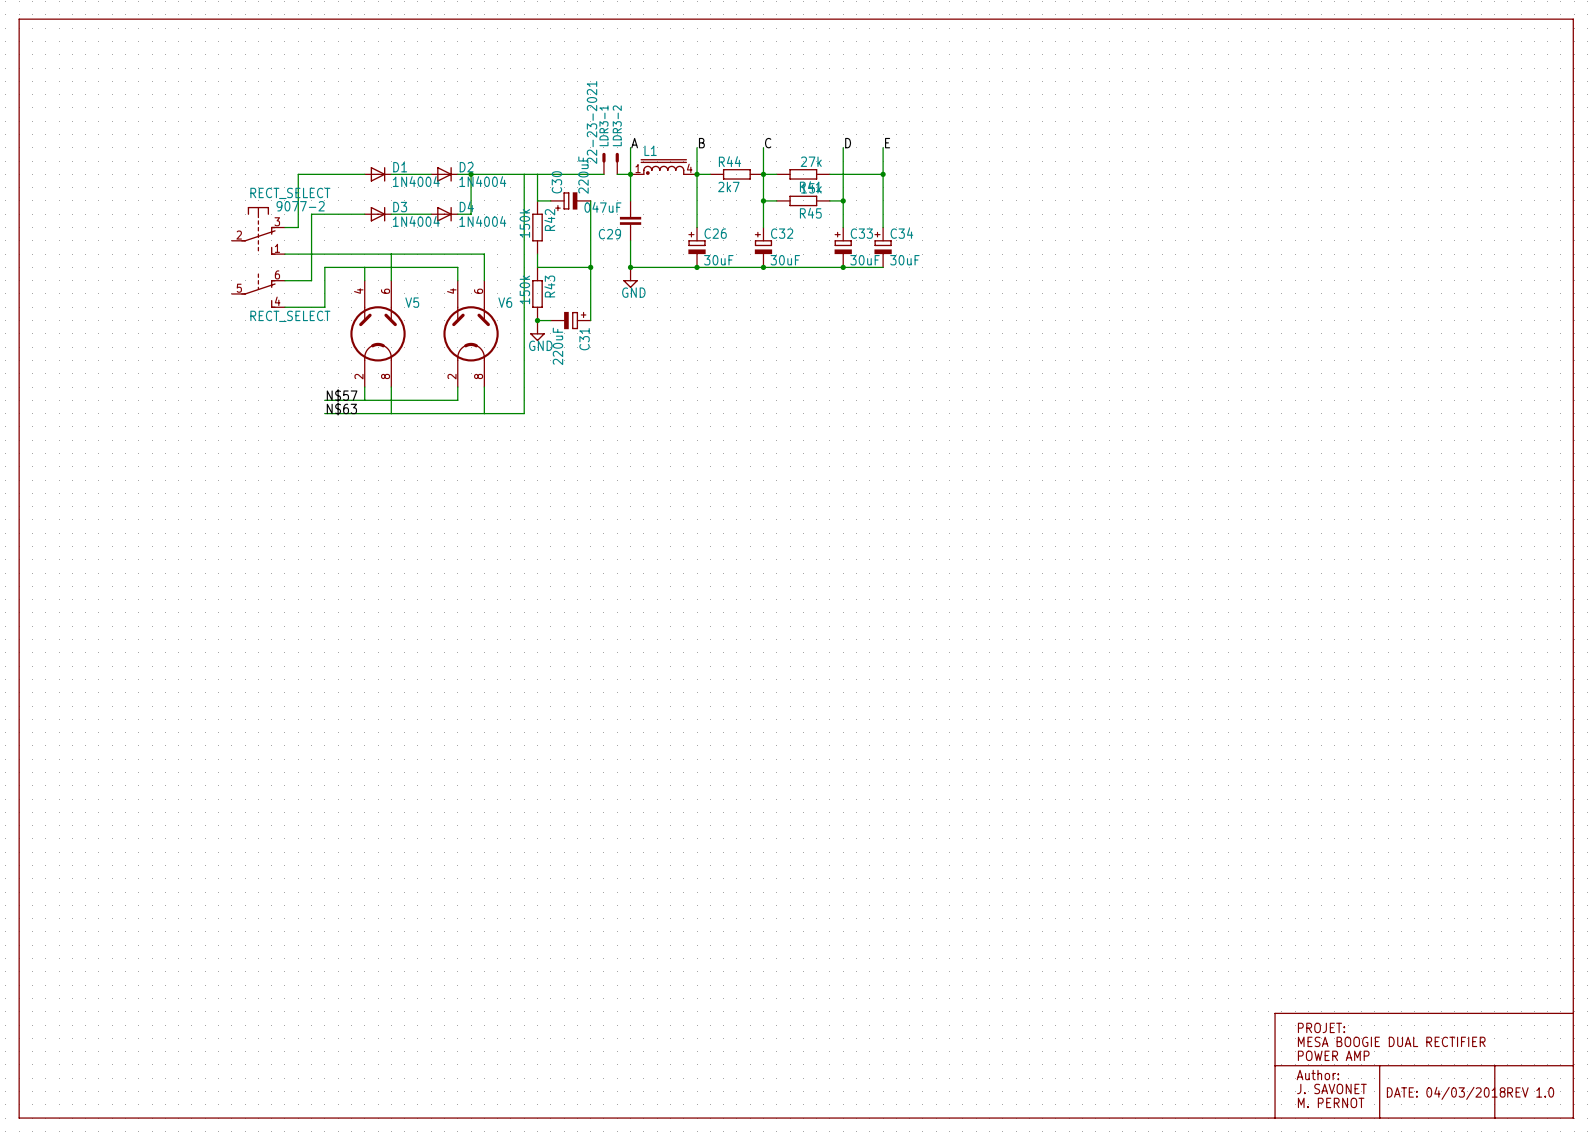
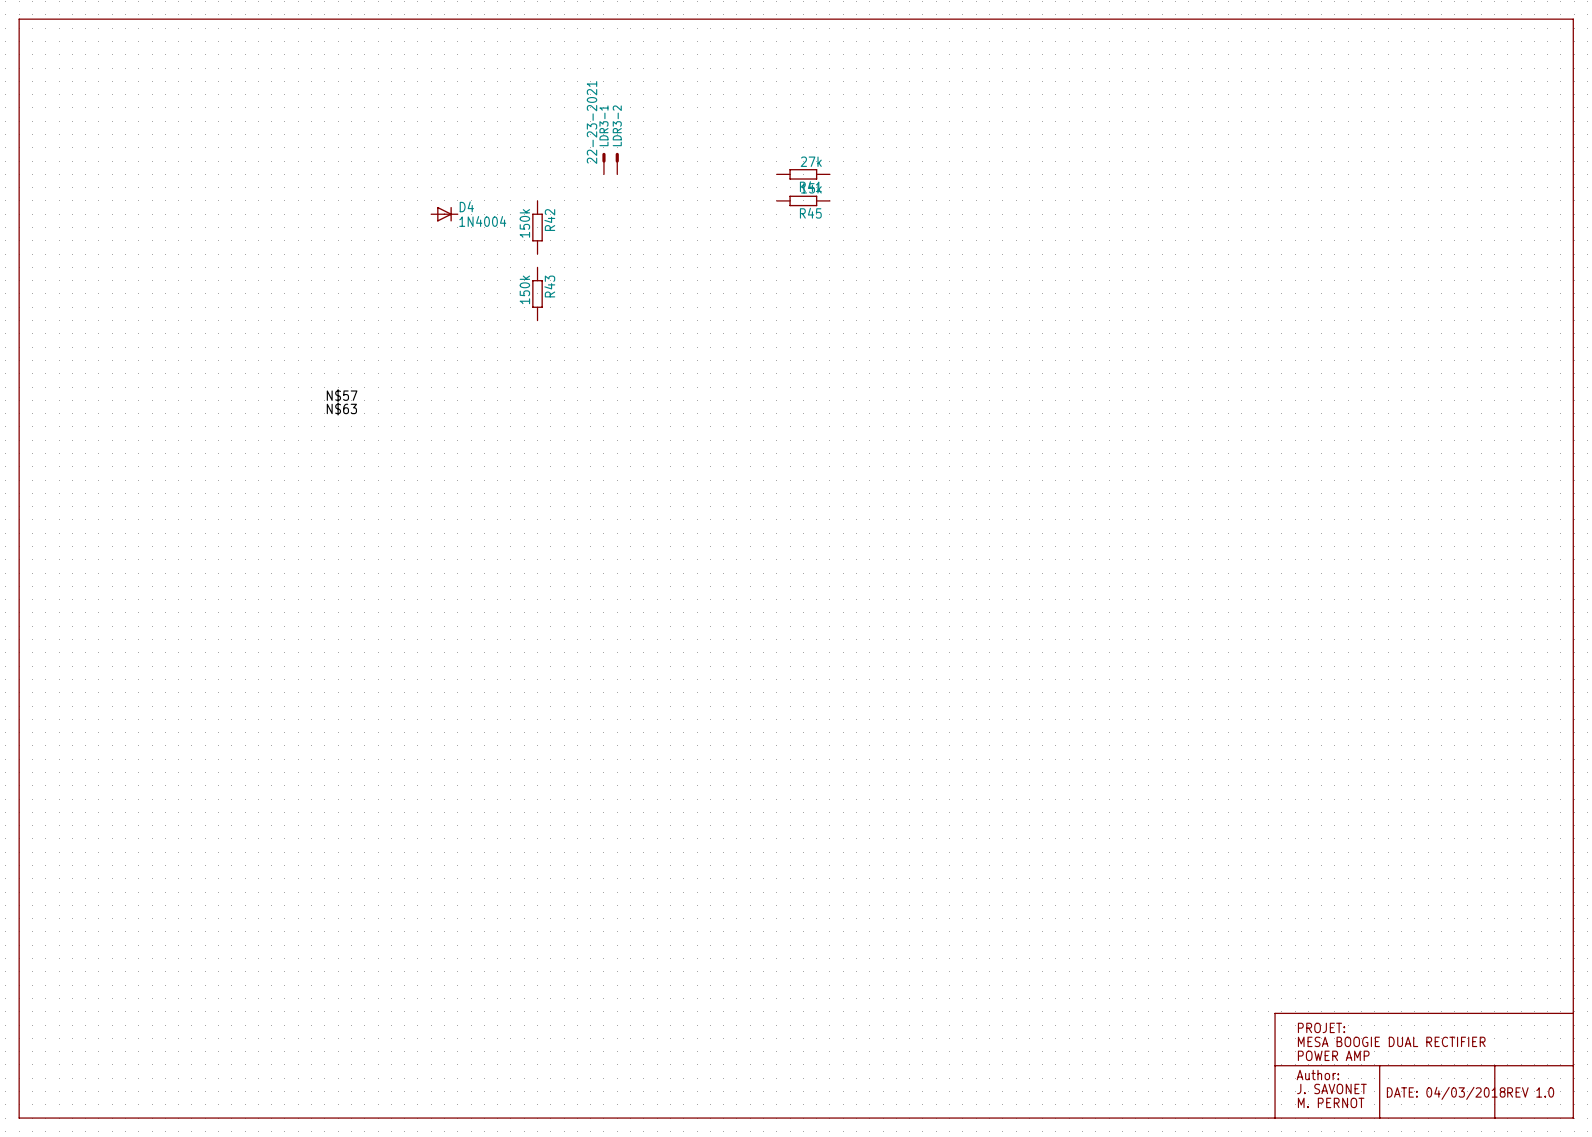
label: A (634, 143) -> none
label: B (701, 143) -> none
label: C (768, 143) -> none
label: D (848, 143) -> none
label: E (887, 143) -> none
wire: (630, 147) (630, 200) -> none
wire: (697, 147) (697, 227) -> none
wire: (763, 147) (763, 227) -> none
wire: (843, 147) (843, 227) -> none
wire: (883, 147) (883, 227) -> none
L1: (663, 167) -> none
wire: (364, 174) (298, 174) (298, 227) (284, 227) -> none
D1: 1N4004 (378, 174) -> none
wire: (391, 174) (431, 174) -> none
D2: 1N4004 (444, 174) -> none
wire: (457, 174) (603, 174) -> none
wire: (471, 174) (471, 214) (457, 214) -> none
junction: (471, 174) -> none
wire: (524, 174) (524, 413) (324, 413) -> none
wire: (537, 174) (537, 200) (550, 200) -> none
wire: (617, 174) (630, 174) -> none
junction: (630, 174) -> none
wire: (697, 174) (710, 174) -> none
junction: (697, 174) -> none
R44: 2k7 (736, 174) -> none
wire: (763, 174) (776, 174) -> none
junction: (763, 174) -> none
wire: (829, 174) (883, 174) -> none
junction: (883, 174) -> none
C30: 220uF (570, 200) -> none
wire: (590, 200) (590, 320) -> none
wire: (763, 200) (776, 200) -> none
junction: (763, 200) -> none
wire: (829, 200) (843, 200) -> none
junction: (843, 200) -> none
wire: (364, 214) (311, 214) (311, 280) (284, 280) -> none
D3: 1N4004 (378, 214) -> none
wire: (391, 214) (431, 214) -> none
C29: 047uF (630, 220) -> none
RECT_SELECT: 9077-2 (258, 230) -> none
wire: (630, 240) (630, 267) (883, 267) -> none
C26: 30uF (697, 247) -> none
C32: 30uF (763, 247) -> none
C33: 30uF (843, 247) -> none
C34: 30uF (883, 247) -> none
wire: (284, 254) (484, 254) (484, 280) -> none
wire: (391, 254) (391, 280) -> none
wire: (537, 254) (537, 267) (590, 267) -> none
wire: (364, 267) (364, 280) -> none
junction: (590, 267) -> none
junction: (630, 267) -> none
junction: (697, 267) -> none
junction: (763, 267) -> none
junction: (843, 267) -> none
power symbol: GND (630, 277) -> none
wire: (457, 280) (457, 267) (324, 267) (324, 307) (284, 307) -> none
RECT_SELECT: (258, 290) -> none
wire: (537, 320) (550, 320) -> none
junction: (537, 320) -> none
C31: 220uF (570, 320) -> none
power symbol: GND (537, 330) -> none
V5: (378, 333) -> none
V6: (471, 333) -> none
wire: (364, 387) (364, 400) -> none
wire: (391, 387) (391, 413) -> none
wire: (457, 387) (457, 400) (324, 400) -> none
wire: (484, 387) (484, 413) -> none

